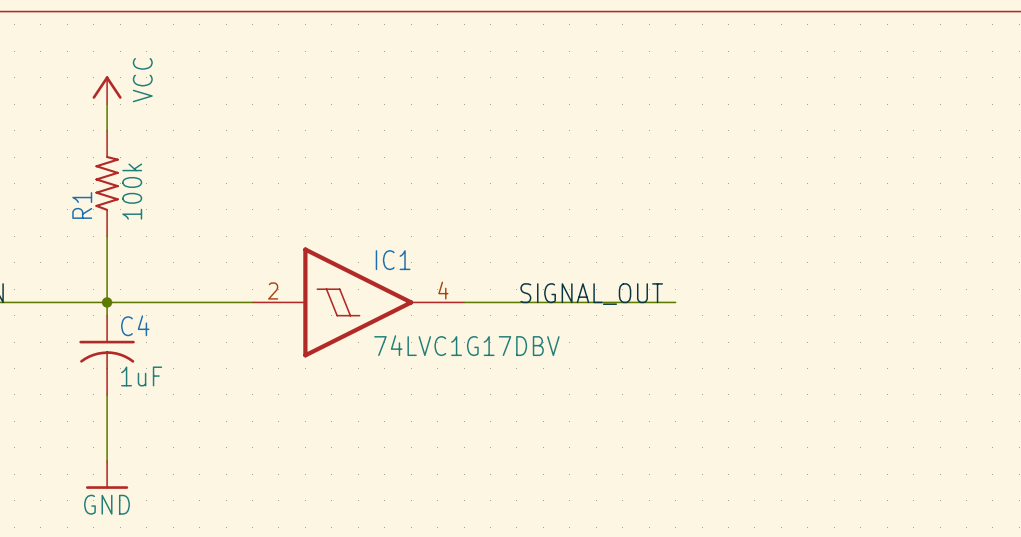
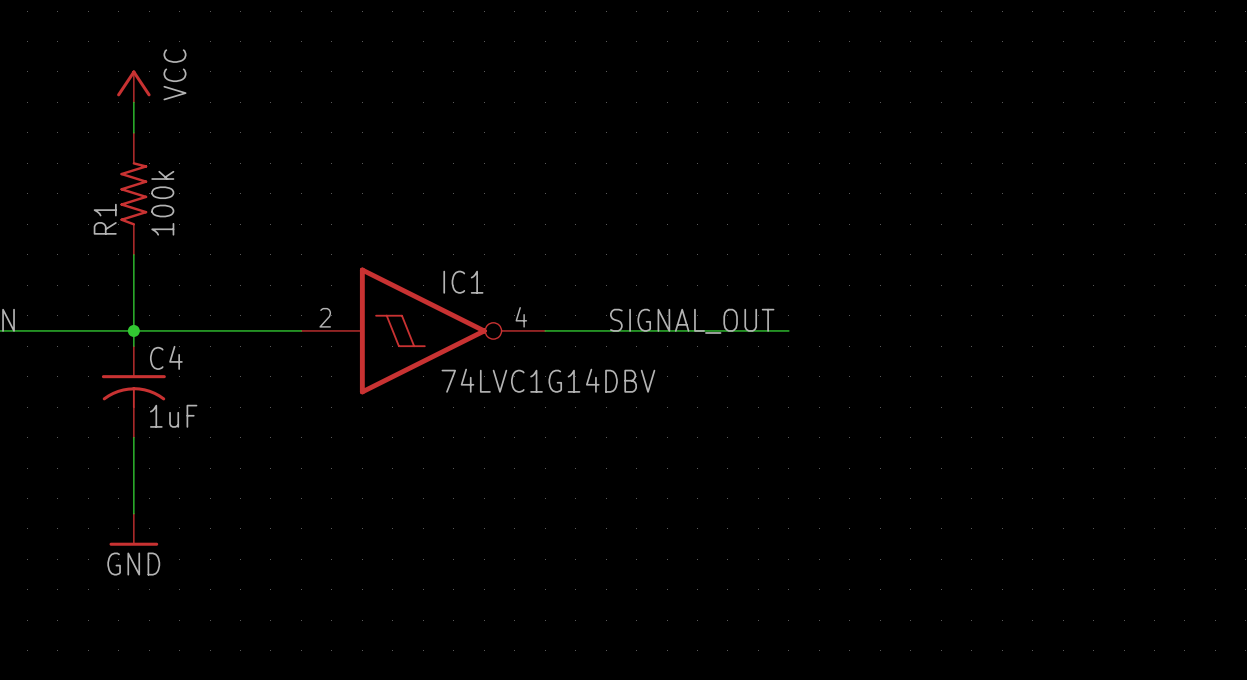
IC1 symbol: [252, 247, 465, 358] -> [301, 267, 546, 395]
IC1 value: 74LVC1G17DBV (466, 345) -> 74LVC1G14DBV (548, 380)

